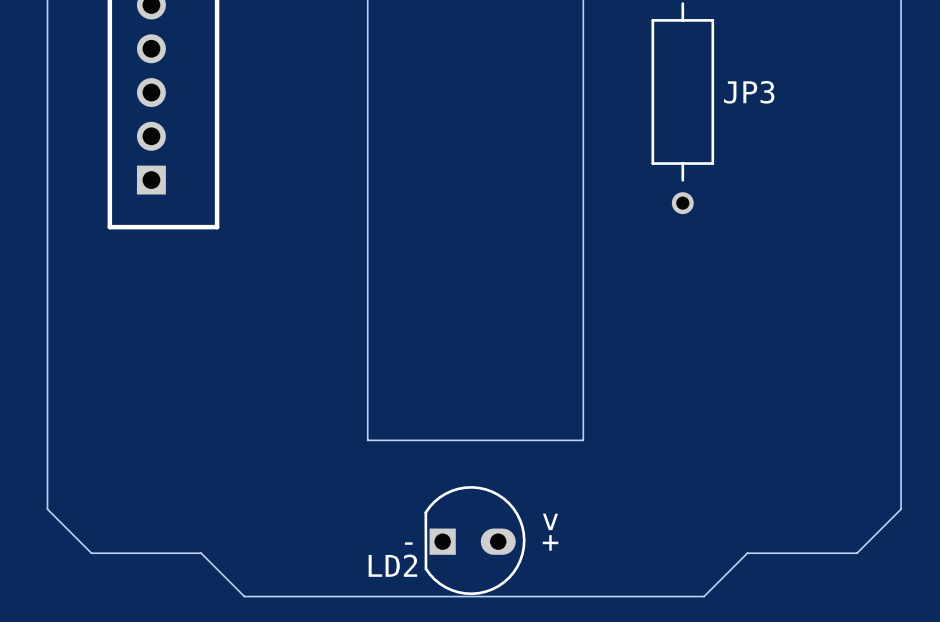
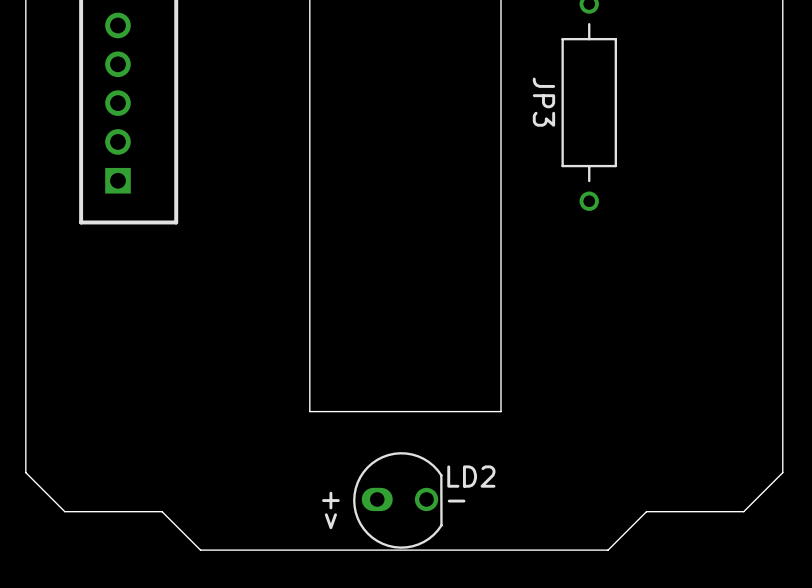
JP3 name rotation: 0° (749, 92) -> 90° clockwise (543, 102)
JP3 name position: JP3 (749, 92) -> JP3 (543, 102)
LD2 footprint: [424, 486, 526, 596] -> [353, 452, 443, 549]
LD2 name position: LD2 (392, 565) -> LD2 (471, 476)

